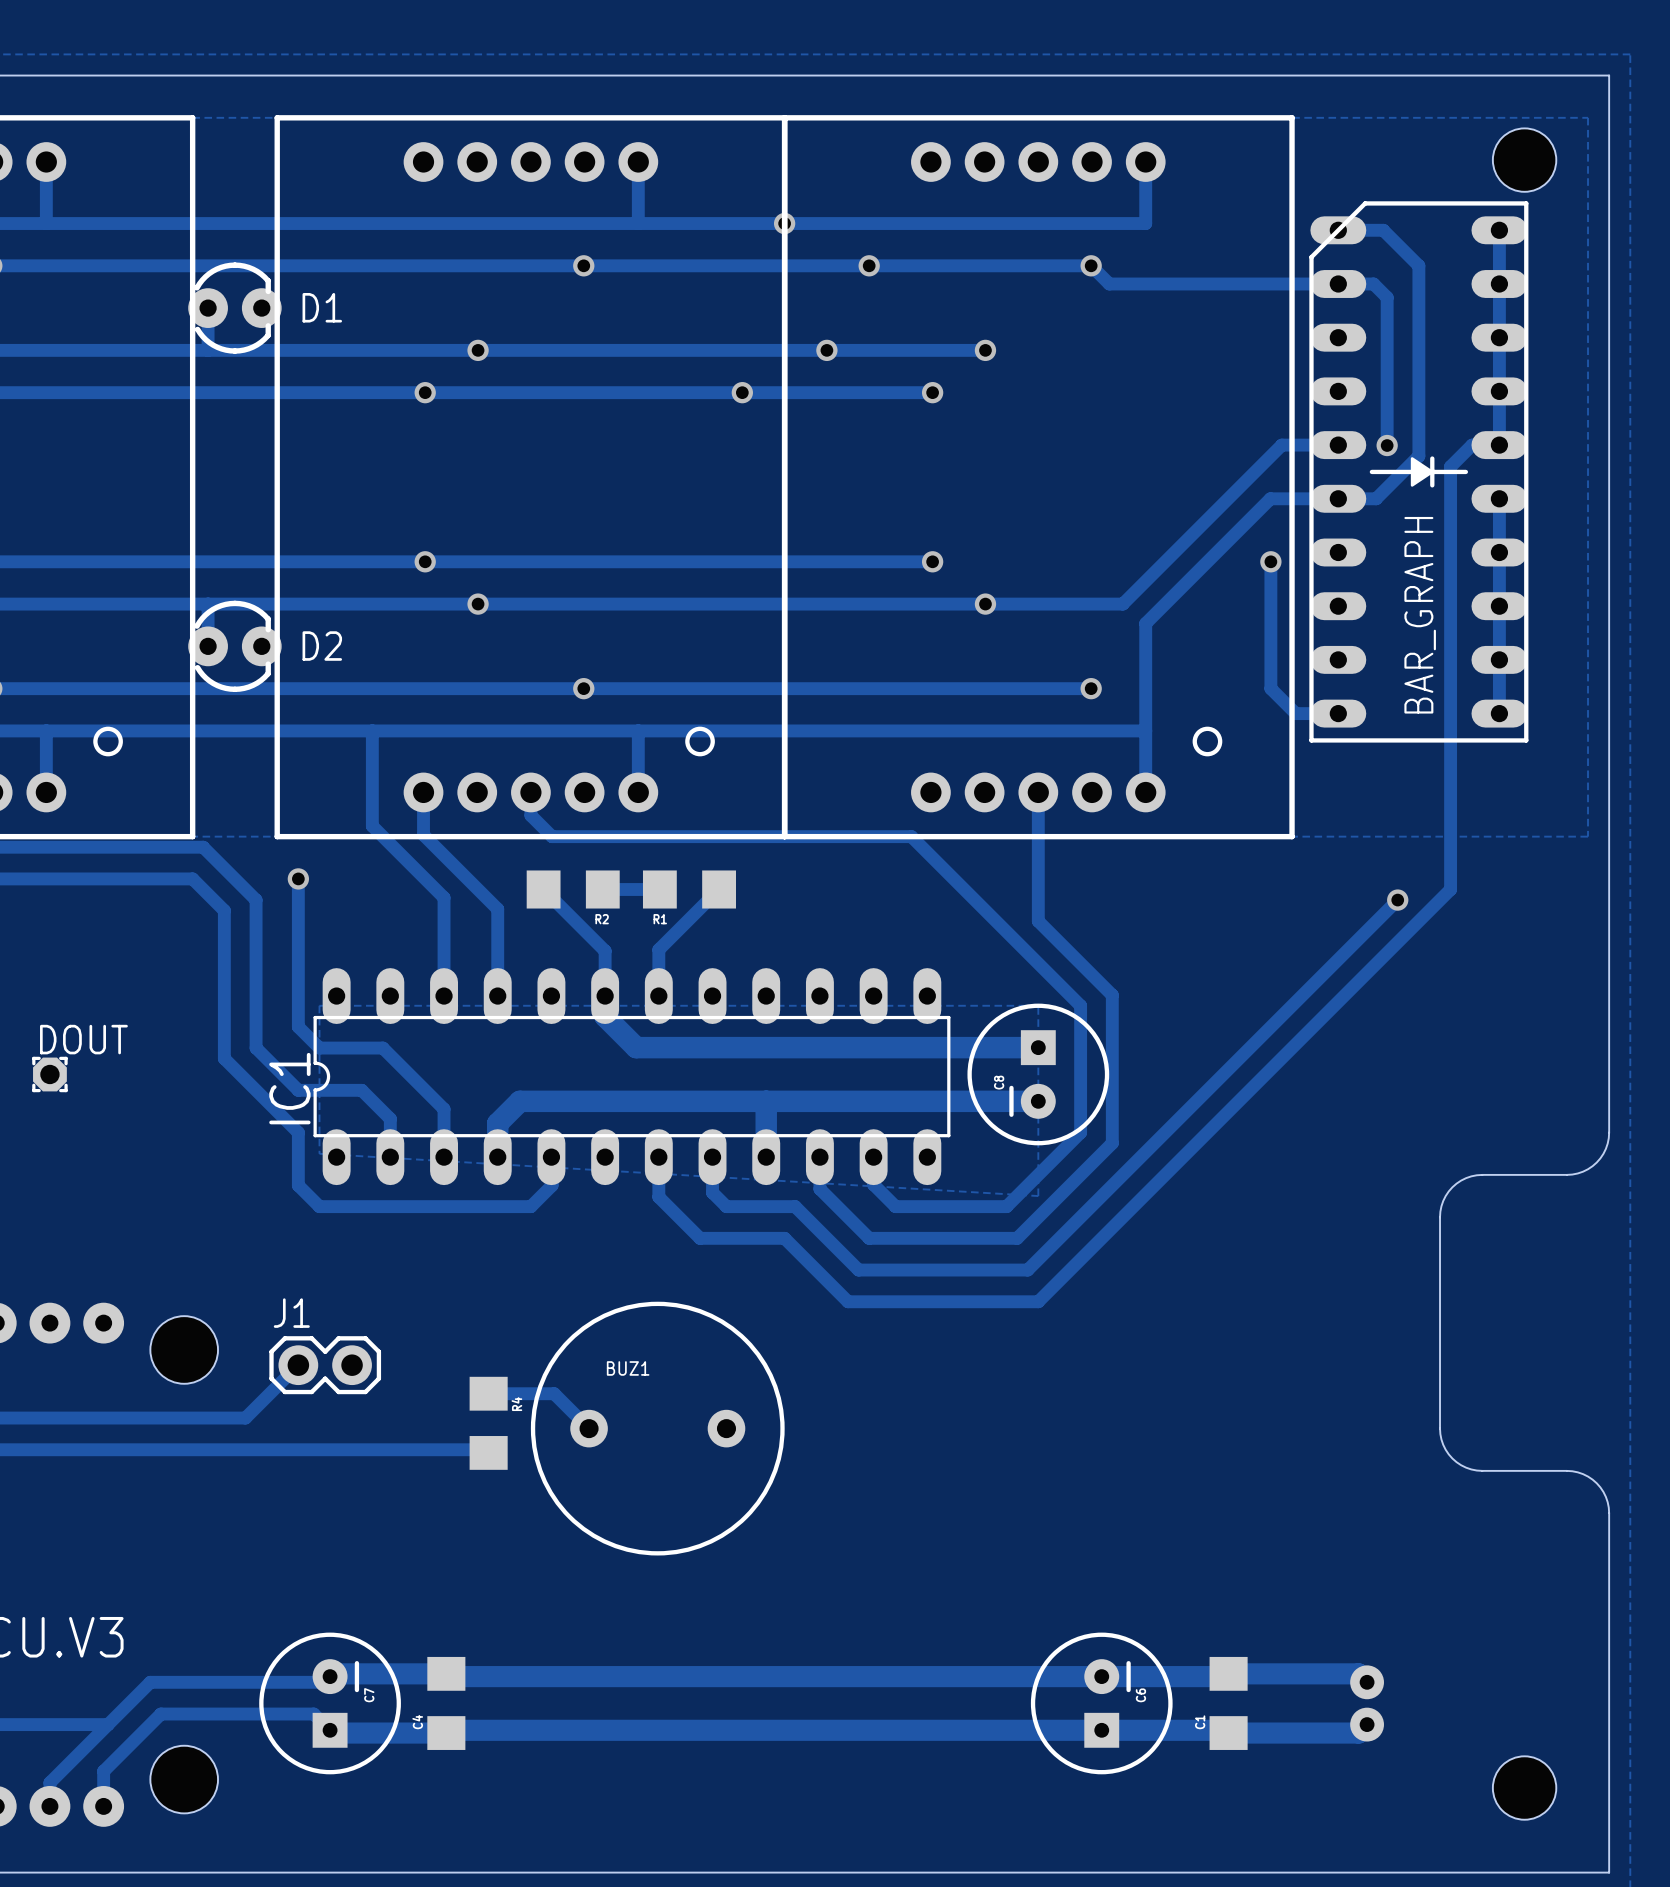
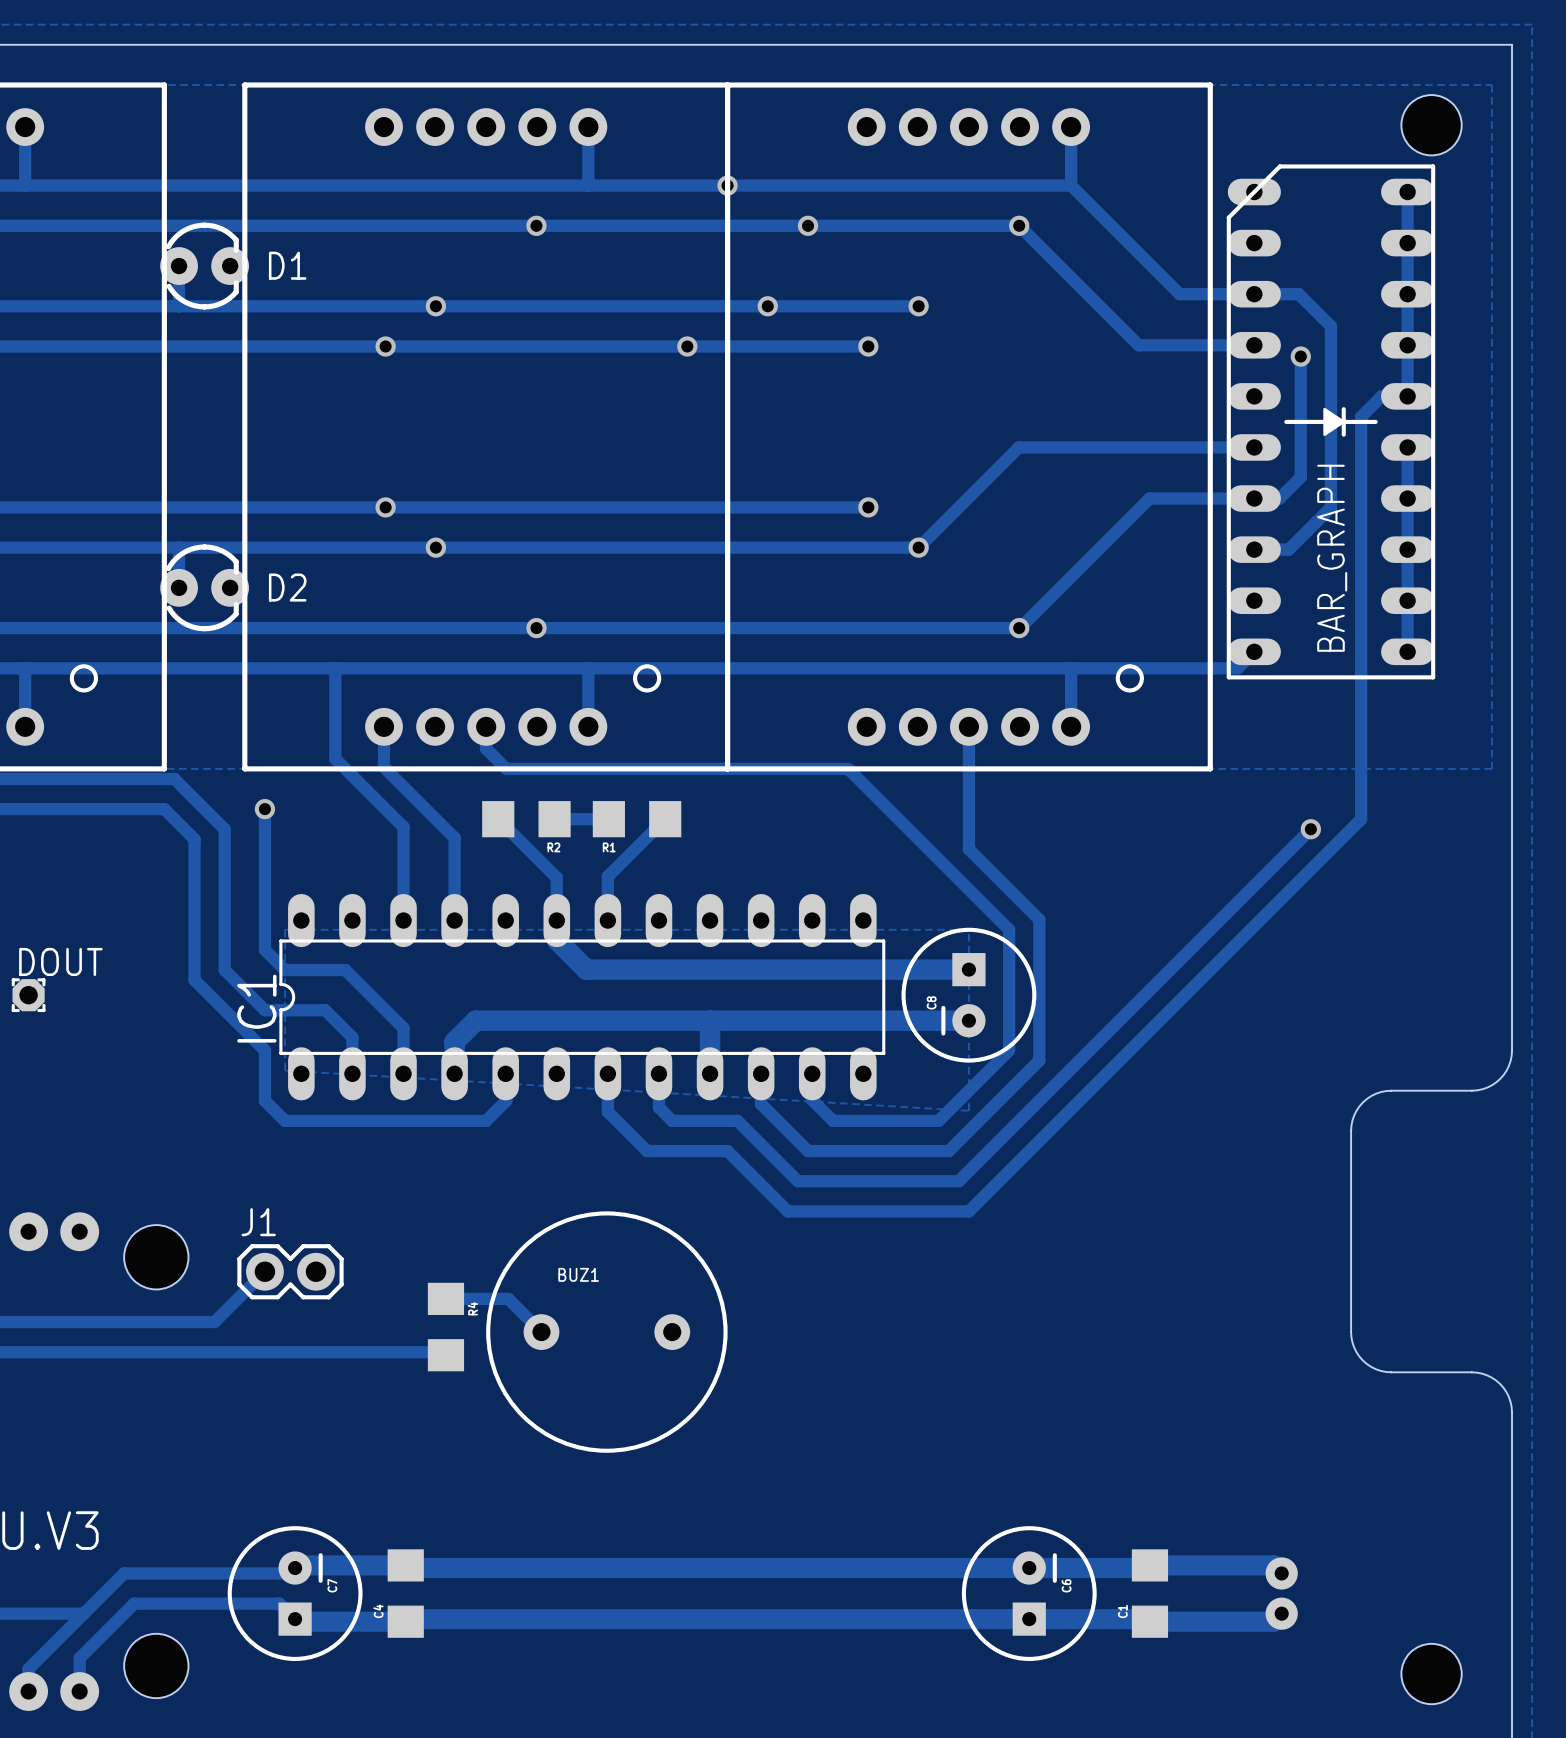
track: (1338, 230) (1383, 230) (1418, 265) (1418, 371) -> (1071, 185) (1179, 294) (1298, 294) (1330, 326)
track: (1109, 283) (1373, 283) (1387, 297) (1387, 403) -> (1036, 243) (1138, 345) (1254, 345)
track: (1338, 445) (1281, 445) (1122, 604) (985, 604) -> (1189, 447) (1018, 447) (918, 547)
track: none -> (1300, 396) (1300, 477) (1279, 498) (1149, 498) (1019, 628)
via position: (1387, 445) -> (1300, 356)
track: (1418, 456) (1376, 498) (1338, 498) -> (1330, 406) (1330, 507) (1288, 549) (1254, 549)
track: (1270, 498) (1145, 623) (1145, 730) -> none
track: (1270, 561) (1270, 688) (1295, 713) (1338, 713) -> (1071, 668) (1237, 668) (1254, 651)
via: (1270, 561) -> none

